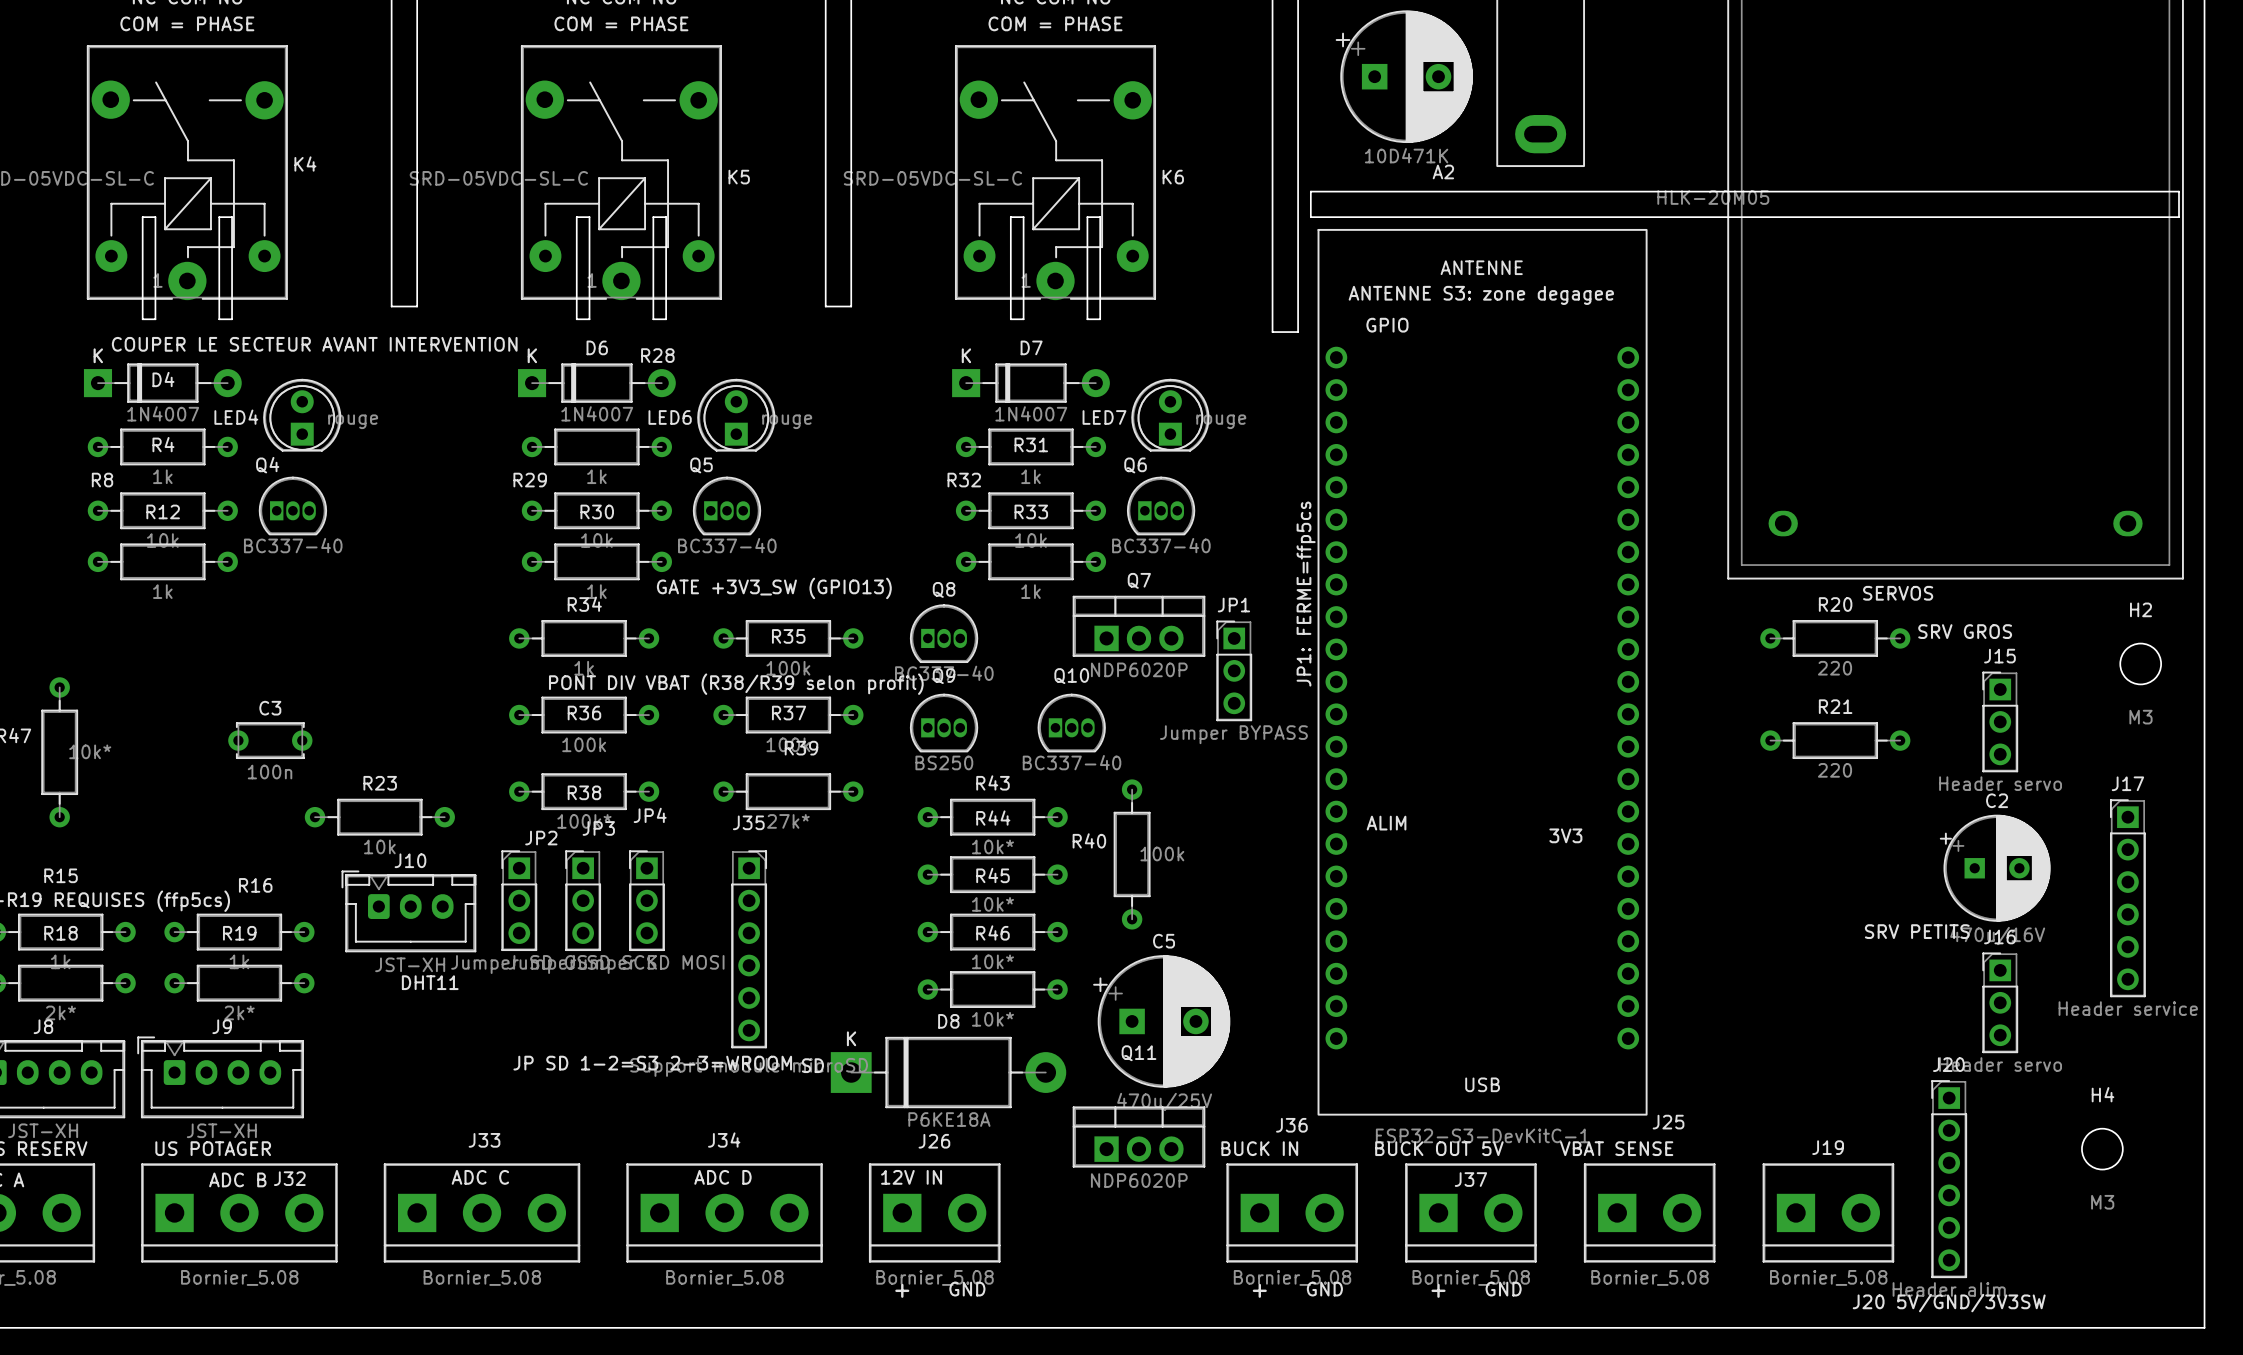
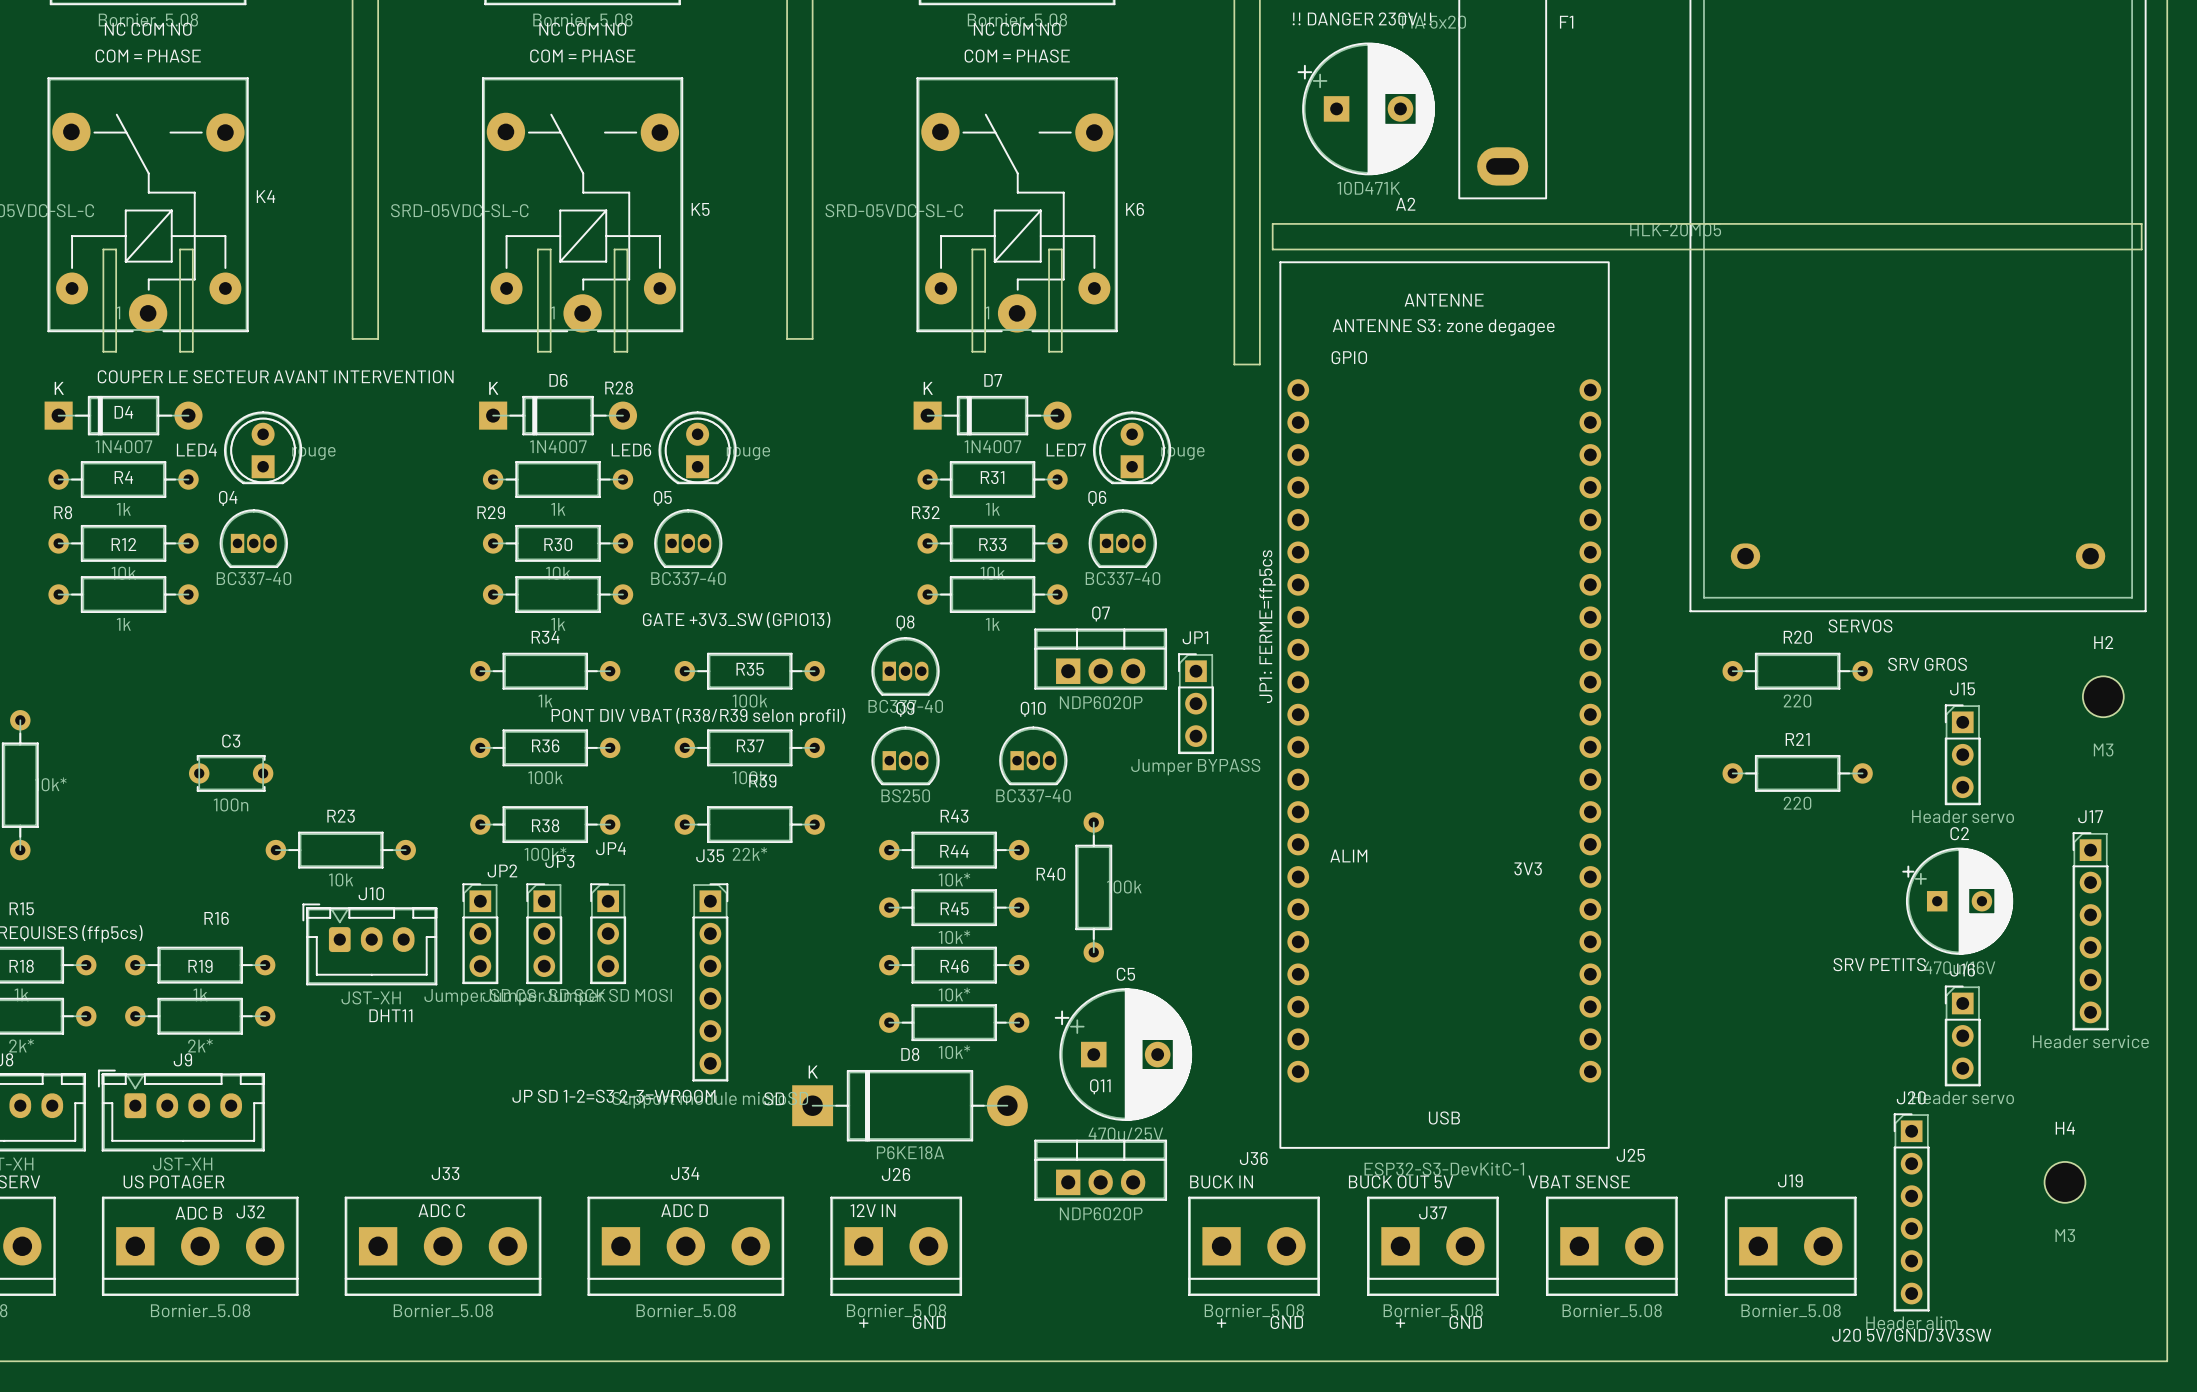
R39 value: 27k* (788, 821) -> 22k* (749, 853)

